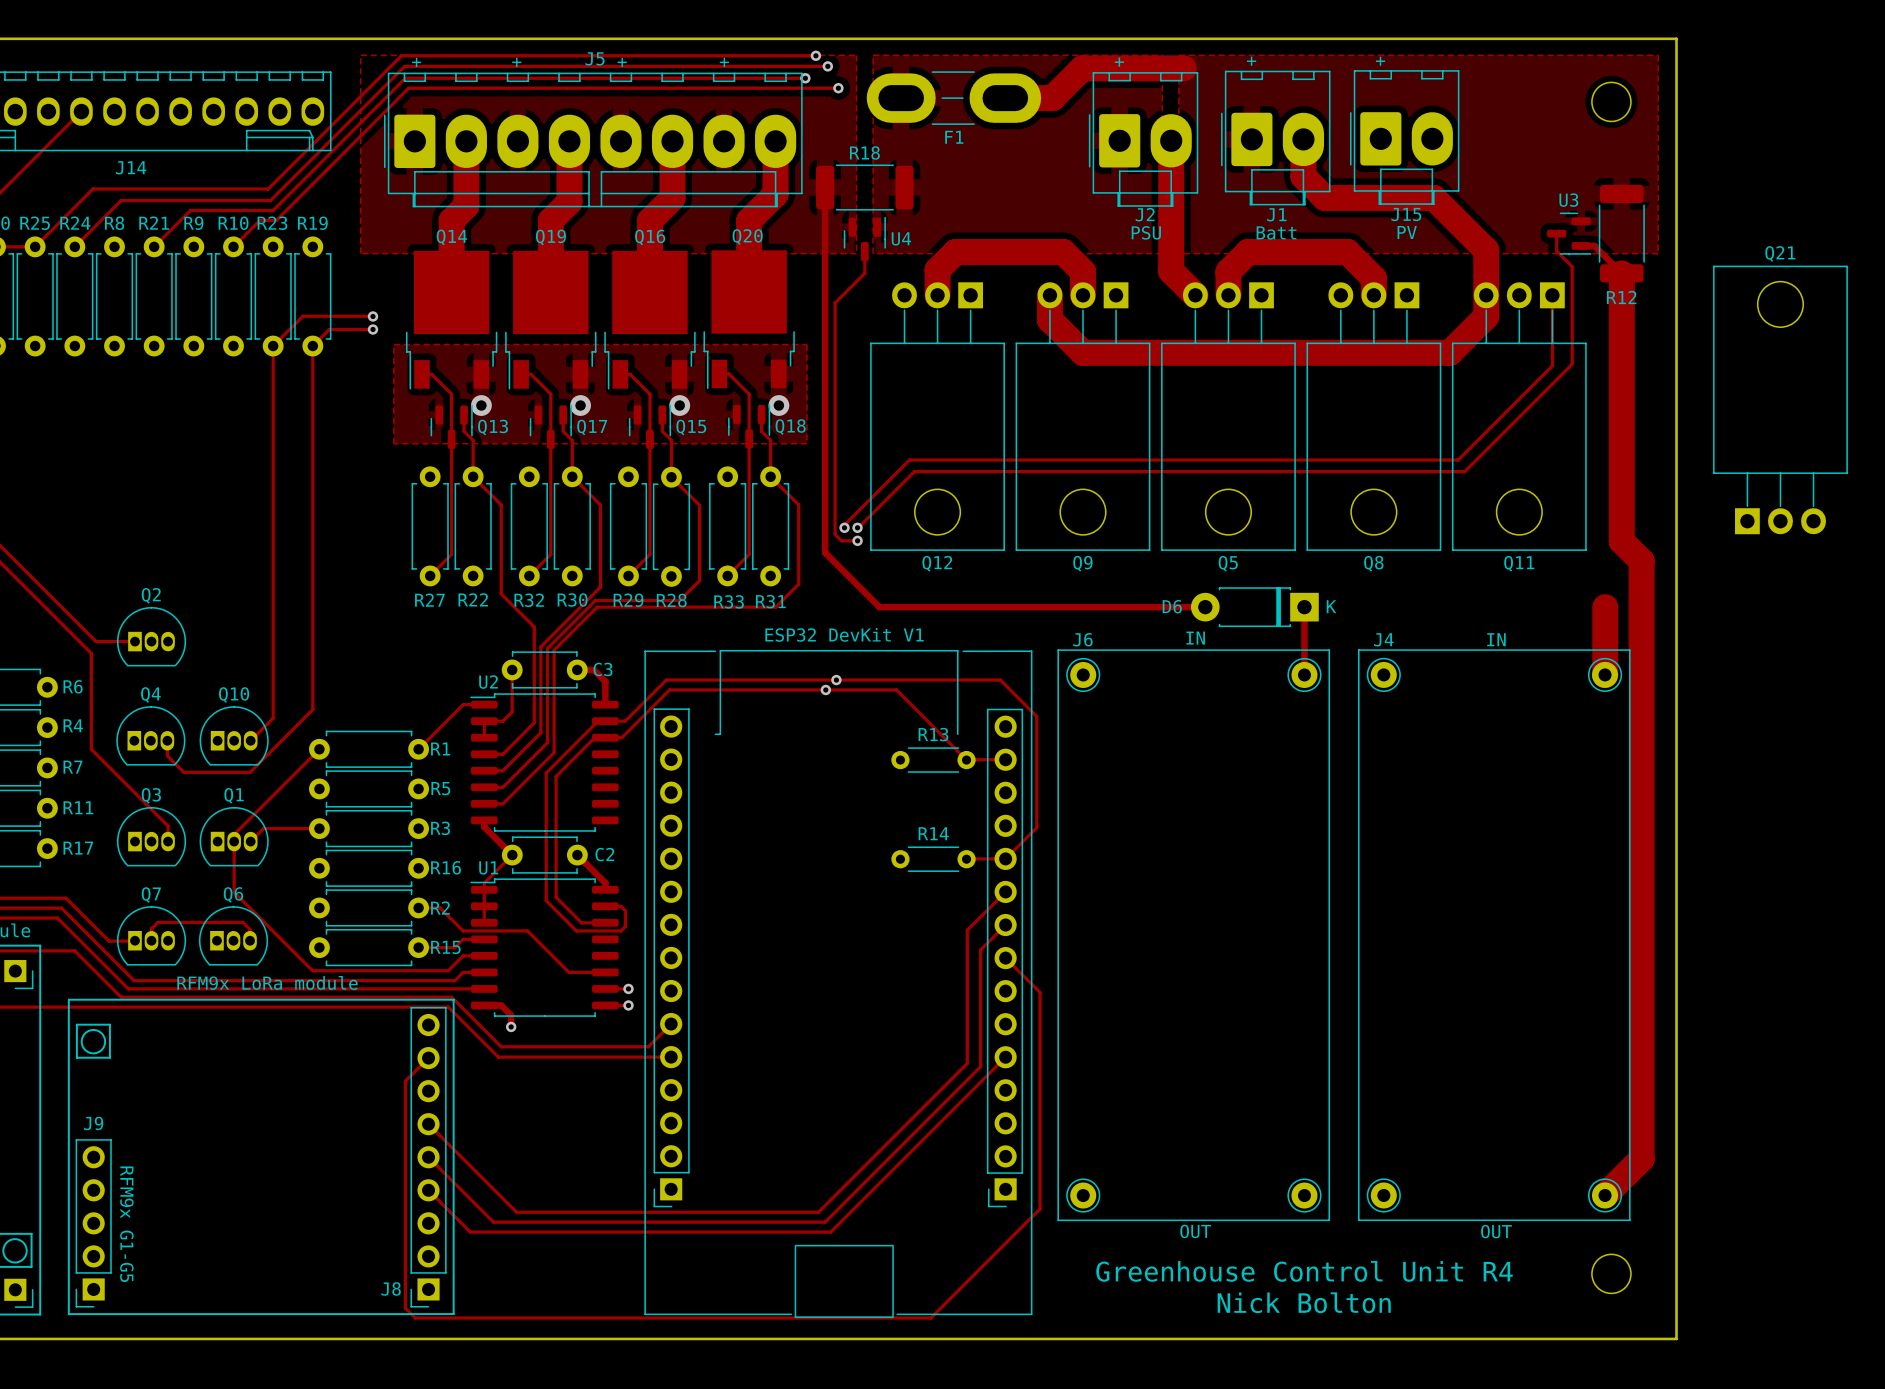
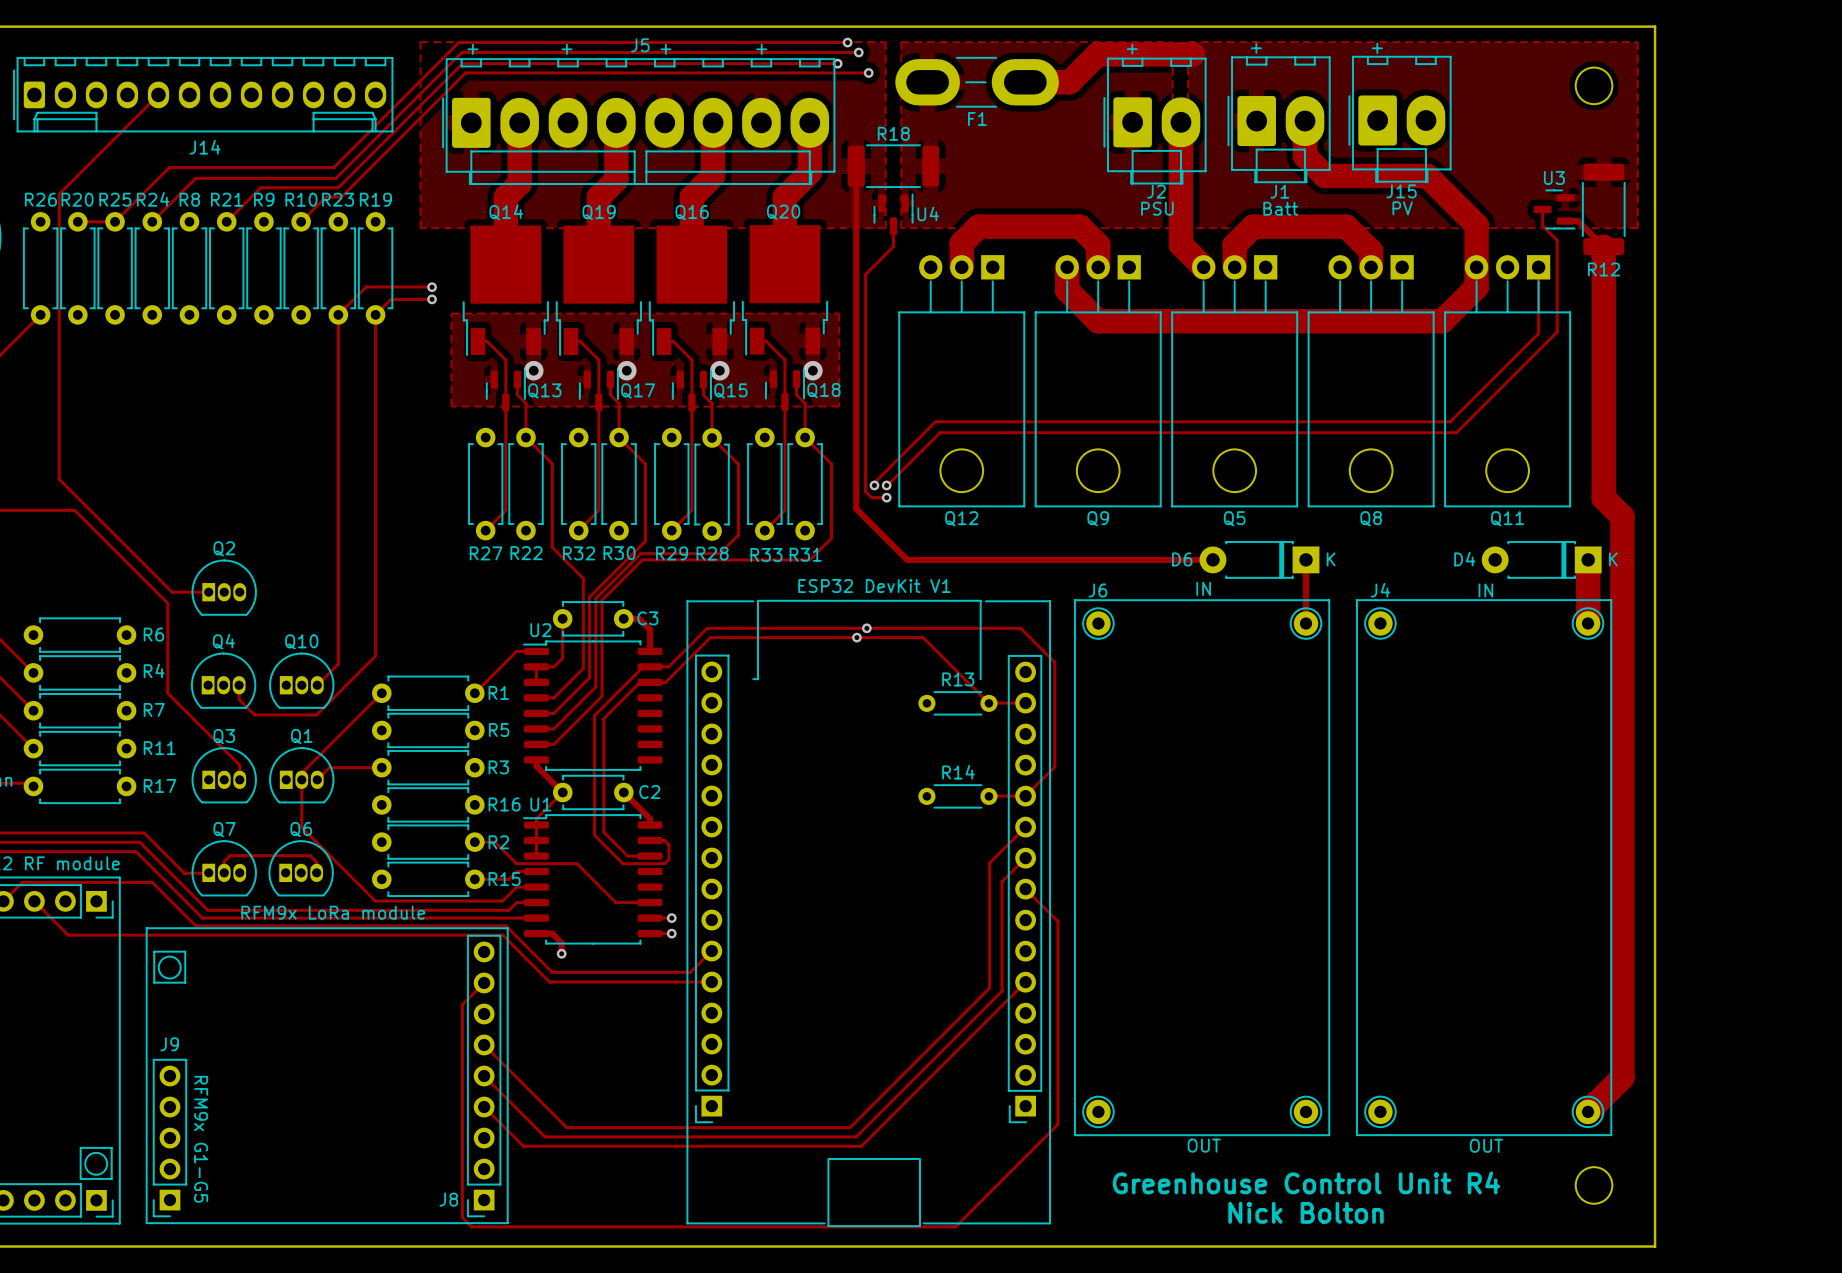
Q21: (1780, 399) -> none
D4: none -> (1541, 559)

